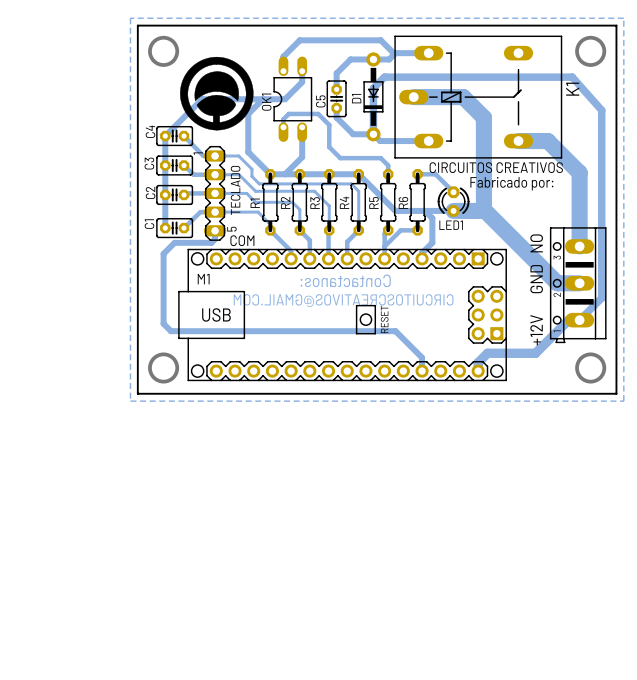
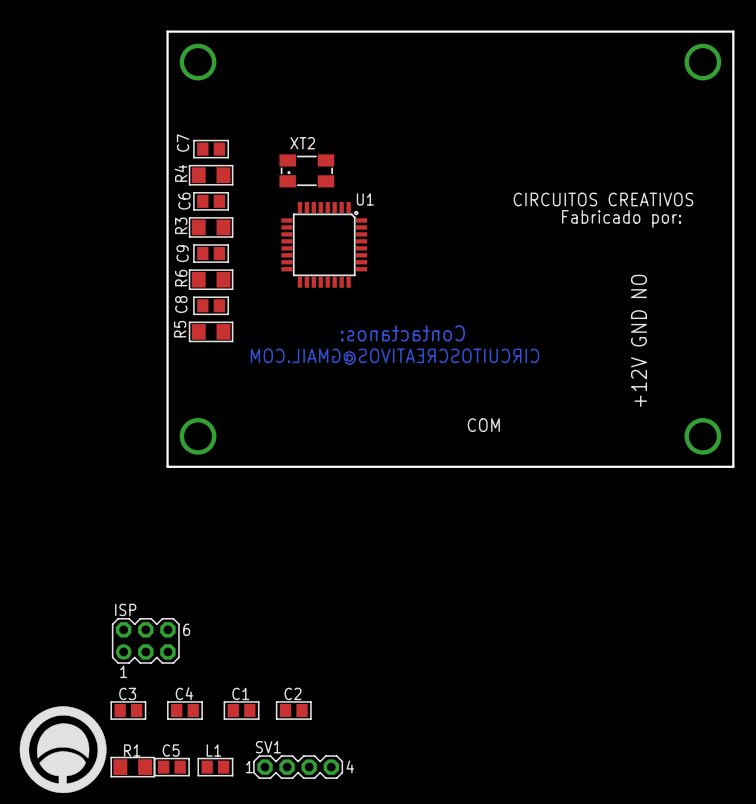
bottom zone outline: (130, 18) (623, 18) (623, 401) (130, 401) (130, 18) -> none
bottom track: (395, 53) (389, 59) (350, 59) (336, 73) (336, 89) -> none
bottom track: (428, 53) (393, 53) (380, 40) (299, 40) (283, 56) (283, 71) -> none
drawing: [180, 56, 254, 131] -> none
bottom track: (302, 71) (302, 82) (285, 99) (202, 99) (165, 136) (165, 228) -> none
C5 footprint: [326, 80, 347, 118] -> [154, 758, 190, 776]
D1: (373, 96) -> none
bottom track: (413, 97) (463, 97) (483, 117) (483, 210) -> none
K1: (478, 97) -> none
bottom track: (263, 99) (248, 113) (248, 152) (270, 174) (358, 174) (395, 210) (483, 210) -> none
OK1: (292, 99) -> none
C5 name position: C5 (320, 101) -> C5 (171, 750)
bottom track: (336, 108) (336, 117) (353, 134) (373, 134) -> none
C7: none -> (211, 149)
C4 footprint: [156, 126, 193, 146] -> [167, 701, 203, 720]
bottom track: (283, 127) (283, 119) (288, 113) (318, 113) (329, 125) (329, 147) (340, 158) (380, 158) (388, 165) (388, 174) -> none
bottom track: (302, 127) (302, 157) (285, 174) -> none
C4 name position: C4 (150, 131) -> C4 (184, 693)
bottom track: (373, 134) (380, 141) (428, 141) -> none
bottom track: (373, 134) (373, 88) (384, 77) (572, 77) (601, 110) (601, 298) (579, 320) (568, 320) (535, 353) (487, 353) (478, 362) (478, 371) -> none
bottom track: (184, 136) (203, 156) (238, 156) (251, 169) (251, 176) (259, 183) (351, 183) (358, 191) (358, 230) (347, 241) (347, 258) -> none
bottom track: (518, 141) (547, 141) (579, 172) (579, 246) -> none
XT2: none -> (306, 170)
C3 footprint: [156, 155, 193, 176] -> [111, 701, 146, 720]
C3 name position: C3 (149, 163) -> C3 (127, 693)
bottom track: (184, 165) (193, 174) (239, 174) (255, 191) (314, 191) (329, 206) (328, 258) -> none
C6: none -> (211, 201)
R1 footprint: [262, 169, 279, 236] -> [111, 757, 155, 777]
R3 footprint: [321, 169, 338, 236] -> [189, 217, 233, 238]
R4 footprint: [350, 169, 367, 236] -> [189, 165, 233, 186]
R5 footprint: [380, 169, 397, 236] -> [189, 322, 233, 342]
R6 footprint: [409, 169, 426, 236] -> [189, 269, 233, 290]
bottom track: (417, 174) (435, 174) (453, 192) -> none
C2 footprint: [156, 185, 193, 205] -> [276, 701, 312, 720]
C2 name position: C2 (150, 192) -> C2 (293, 693)
TECLADO: (215, 193) -> none
bottom track: (184, 194) (184, 193) (246, 193) (255, 202) (292, 202) (299, 209) (299, 230) (309, 240) (309, 258) -> none
LED1: (453, 201) -> none
R2: (299, 202) -> none
R1 name position: R1 (255, 203) -> R1 (132, 750)
U1: none -> (324, 244)
bottom track: (425, 210) (432, 218) (432, 242) (422, 253) (422, 258) -> none
bottom track: (483, 210) (557, 283) (579, 283) -> none
C9: none -> (211, 253)
C1 footprint: [156, 218, 193, 239] -> [224, 701, 259, 720]
C1 name position: C1 (149, 224) -> C1 (240, 693)
bottom track: (184, 228) (200, 212) (258, 212) (270, 224) (270, 230) (291, 251) (291, 258) -> none
bottom track: (215, 230) (215, 239) (211, 242) (174, 242) (163, 253) (163, 323) (170, 331) (395, 331) (422, 357) (422, 371) -> none
bottom track: (388, 230) (384, 233) (384, 258) -> none
bottom track: (417, 230) (400, 230) (384, 246) -> none
text: COM (242, 240) -> none
C8: none -> (211, 305)
part: (578, 285) -> none
M1: (342, 314) -> none
text: none -> COM (483, 425)
ISP: none -> (145, 640)
drawing: none -> [19, 706, 107, 794]
L1: none -> (215, 767)
SV1: none -> (298, 767)

